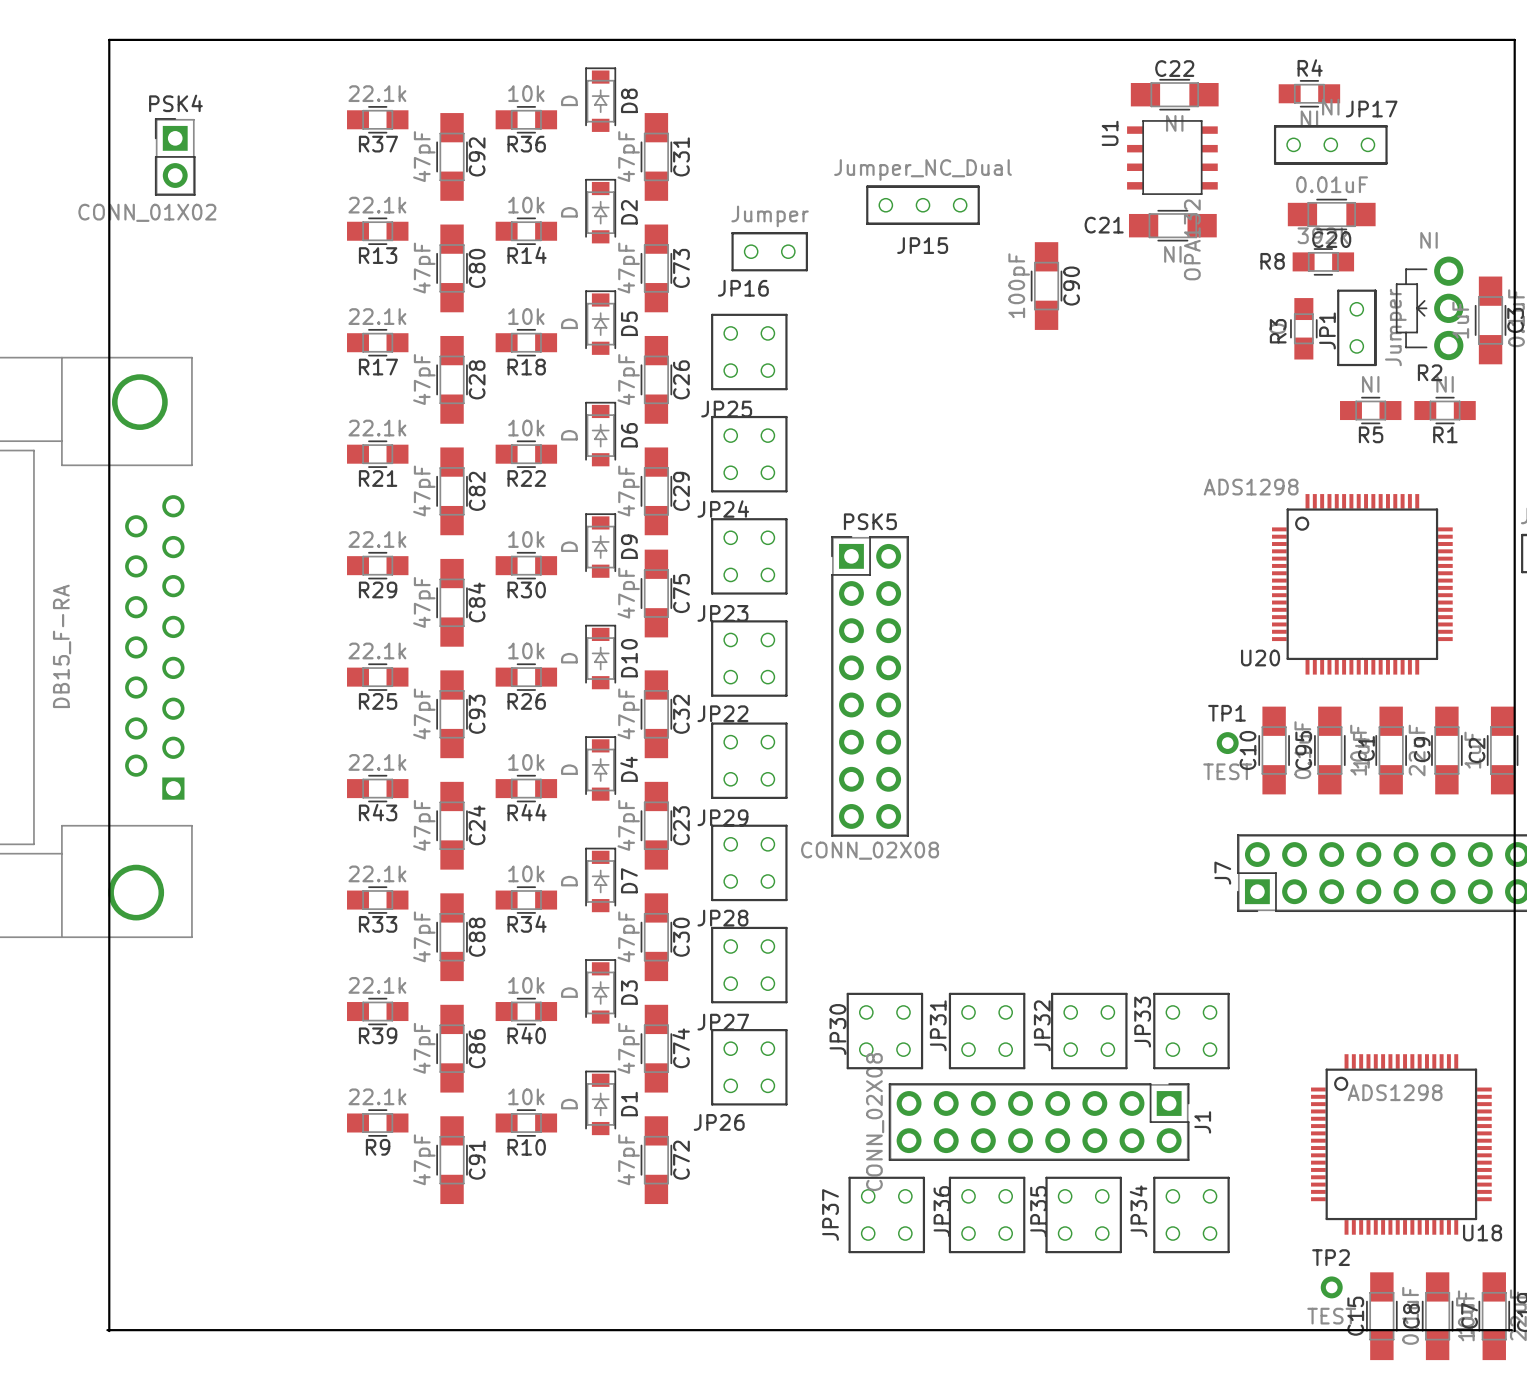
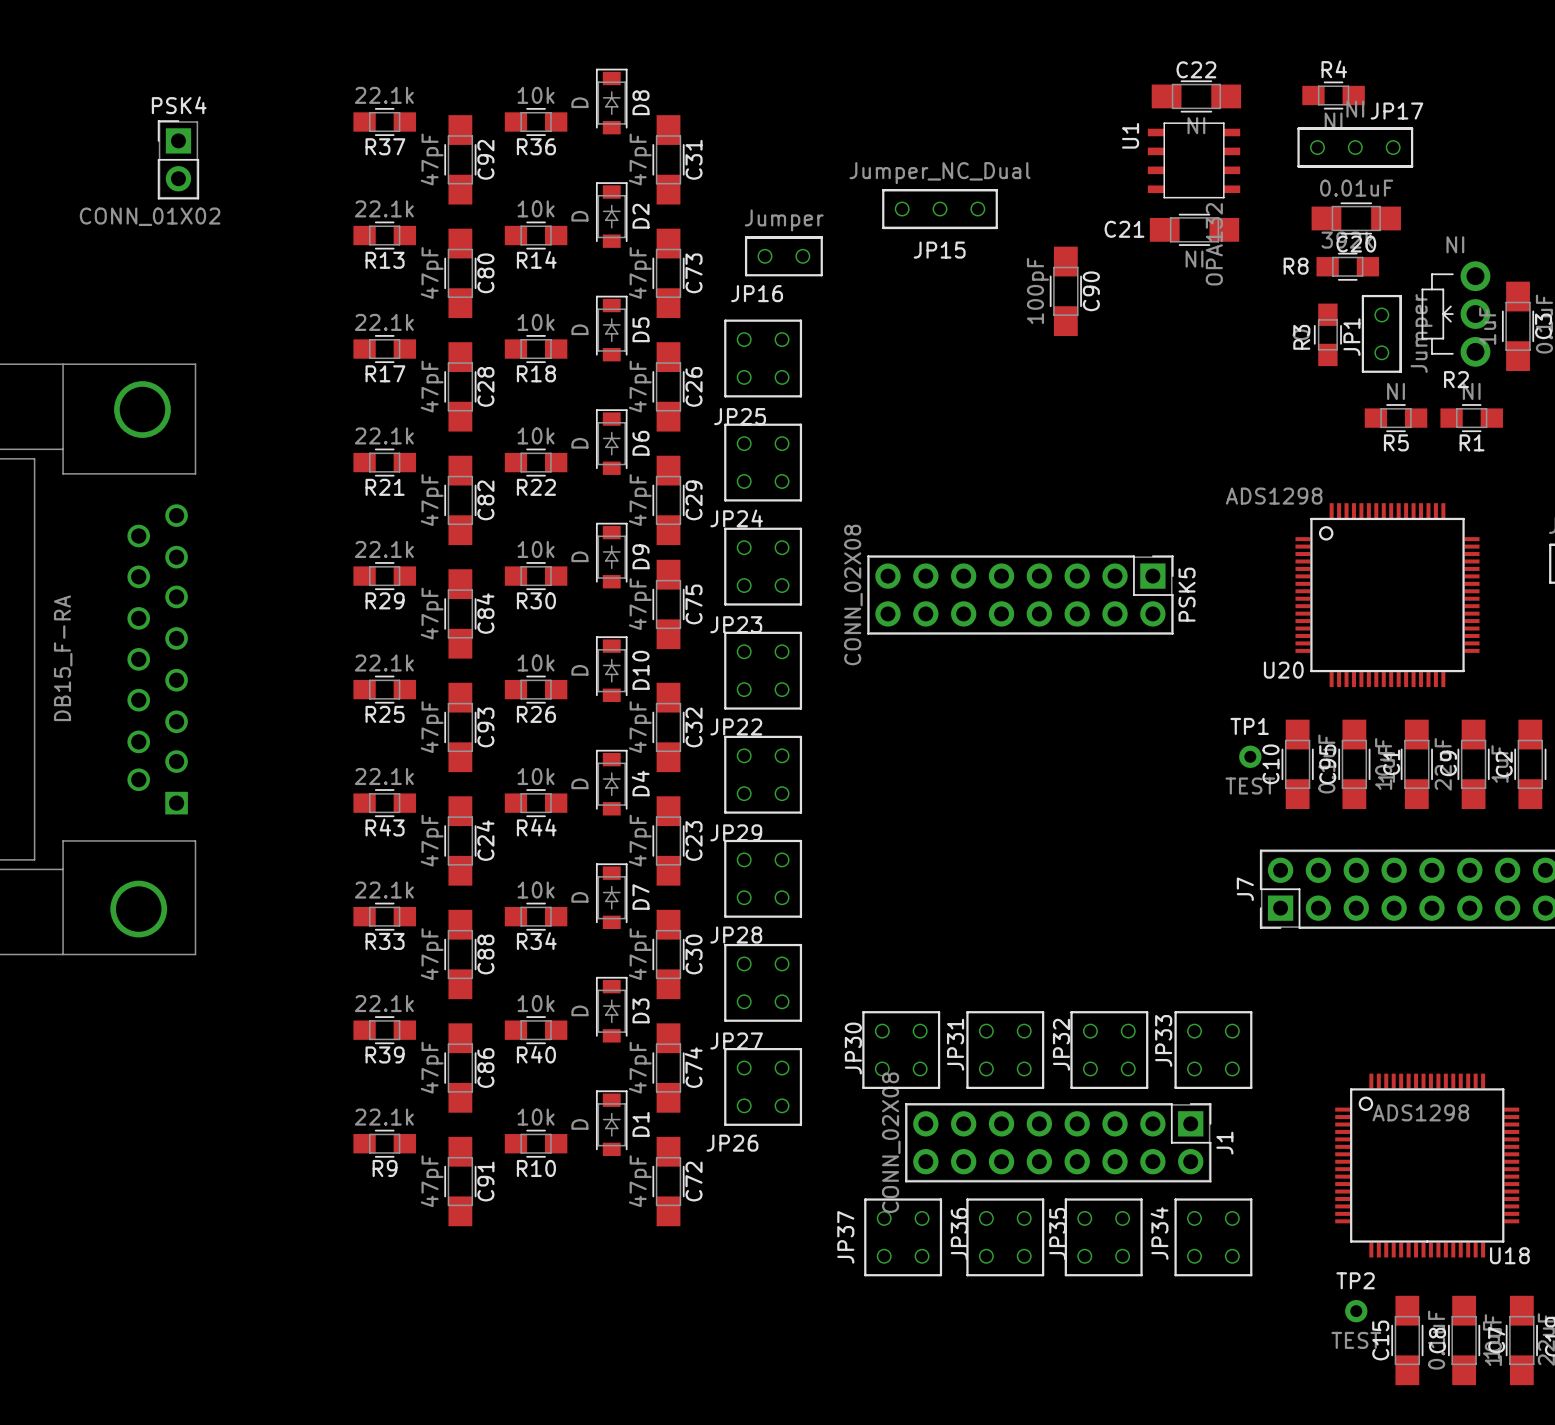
PSK5 rotation: 0° (870, 686) -> 90° clockwise (1020, 595)
board edge: (107, 1330) (1511, 1330) -> none
board edge: (109, 1331) (109, 39) (1514, 39) (1514, 1331) -> none

